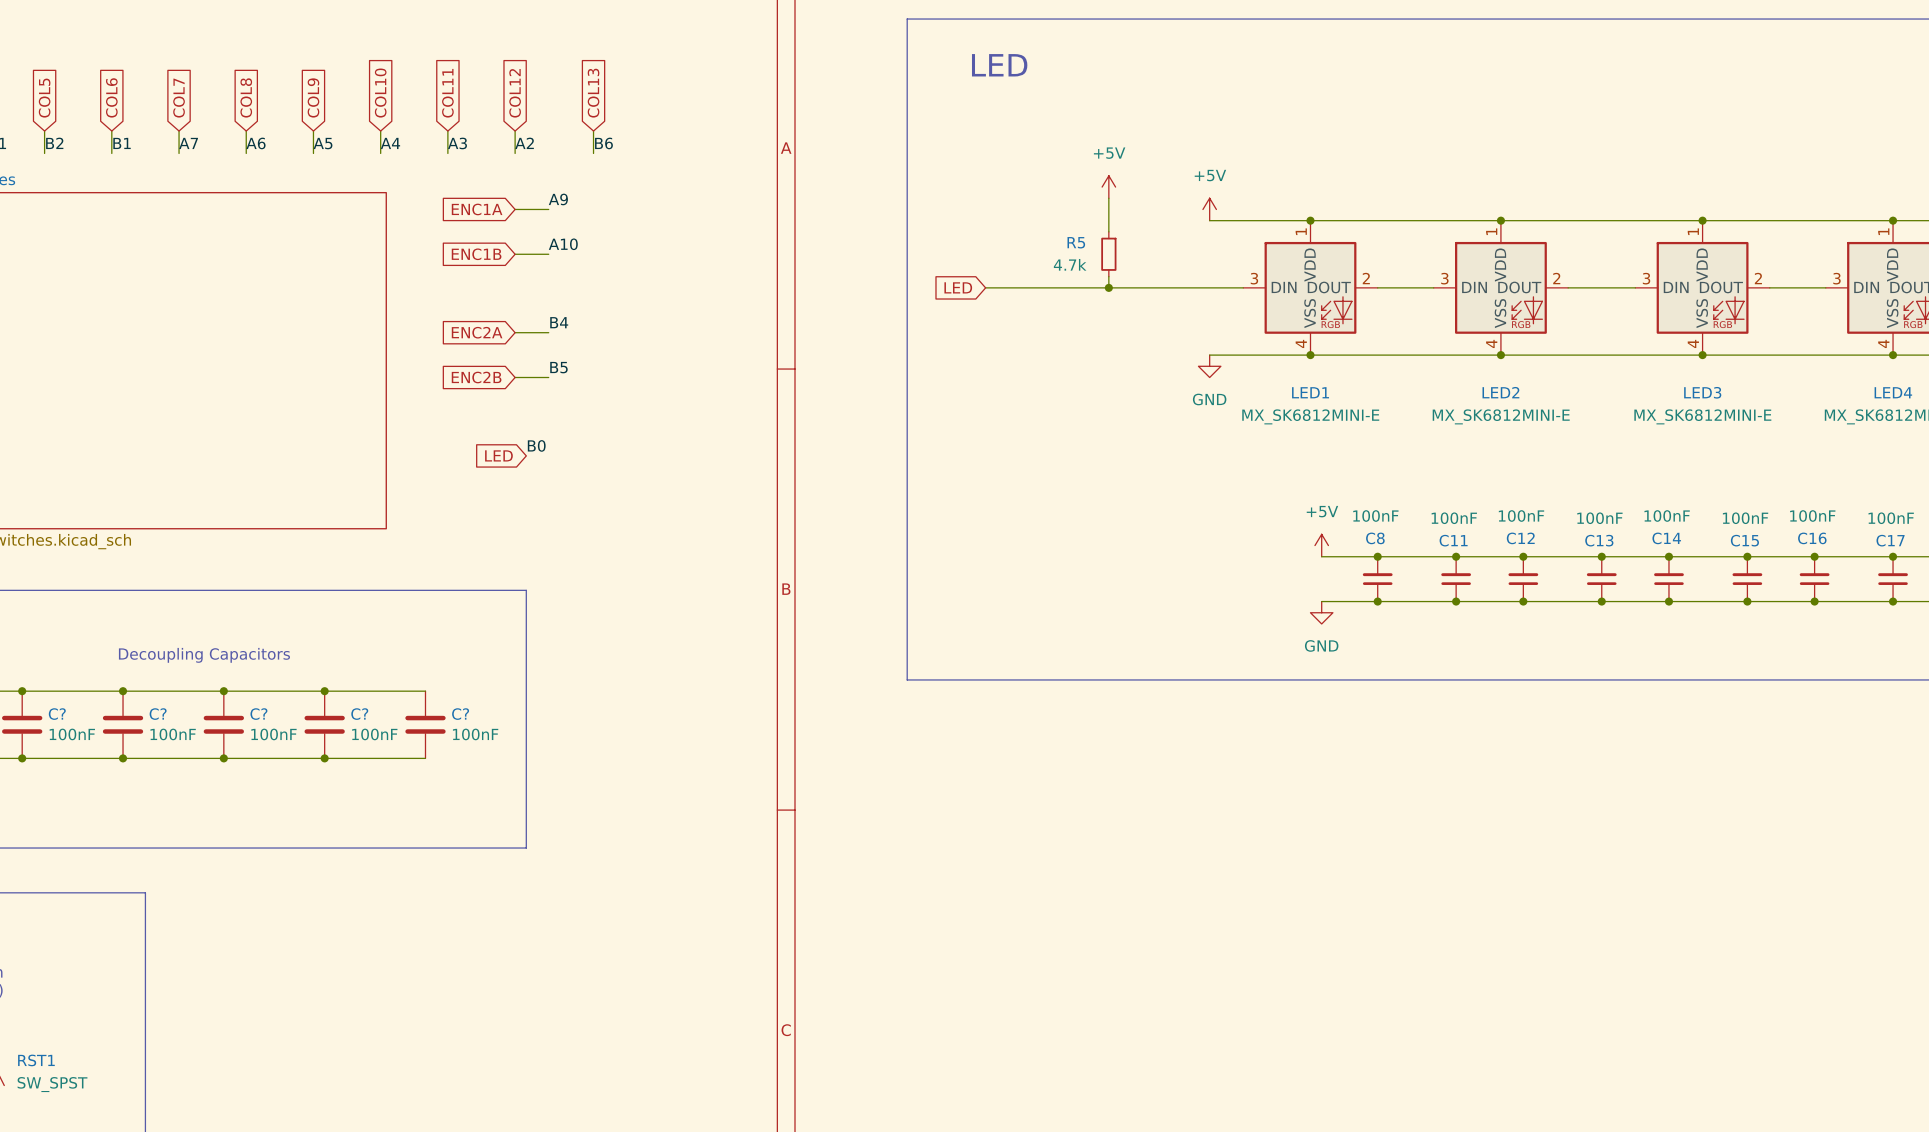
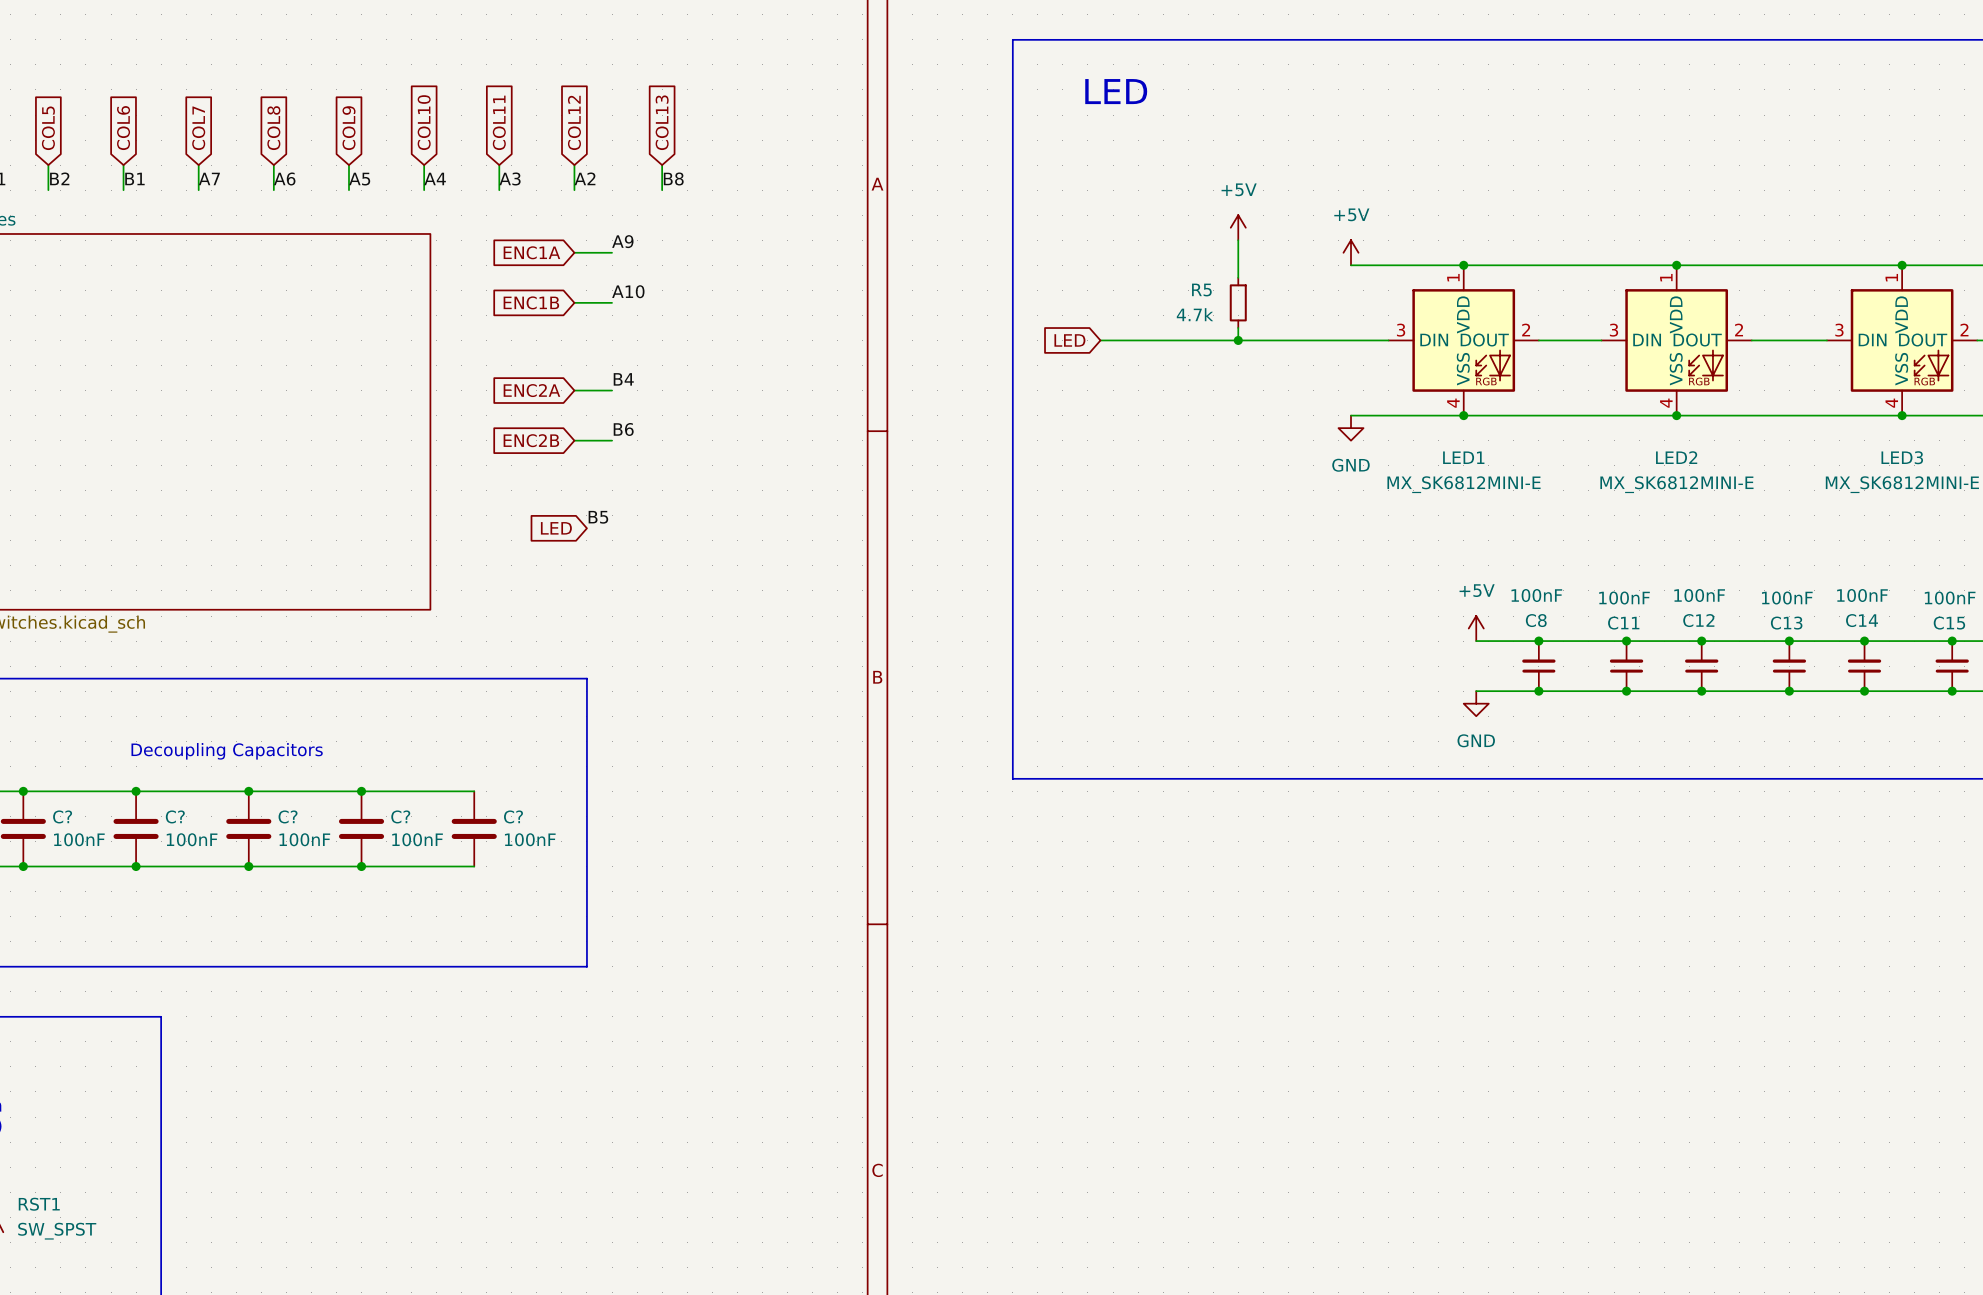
label: B6 (603, 143) -> B8 (673, 178)
label: B5 (558, 367) -> B6 (623, 429)
label: B0 (536, 445) -> B5 (598, 517)

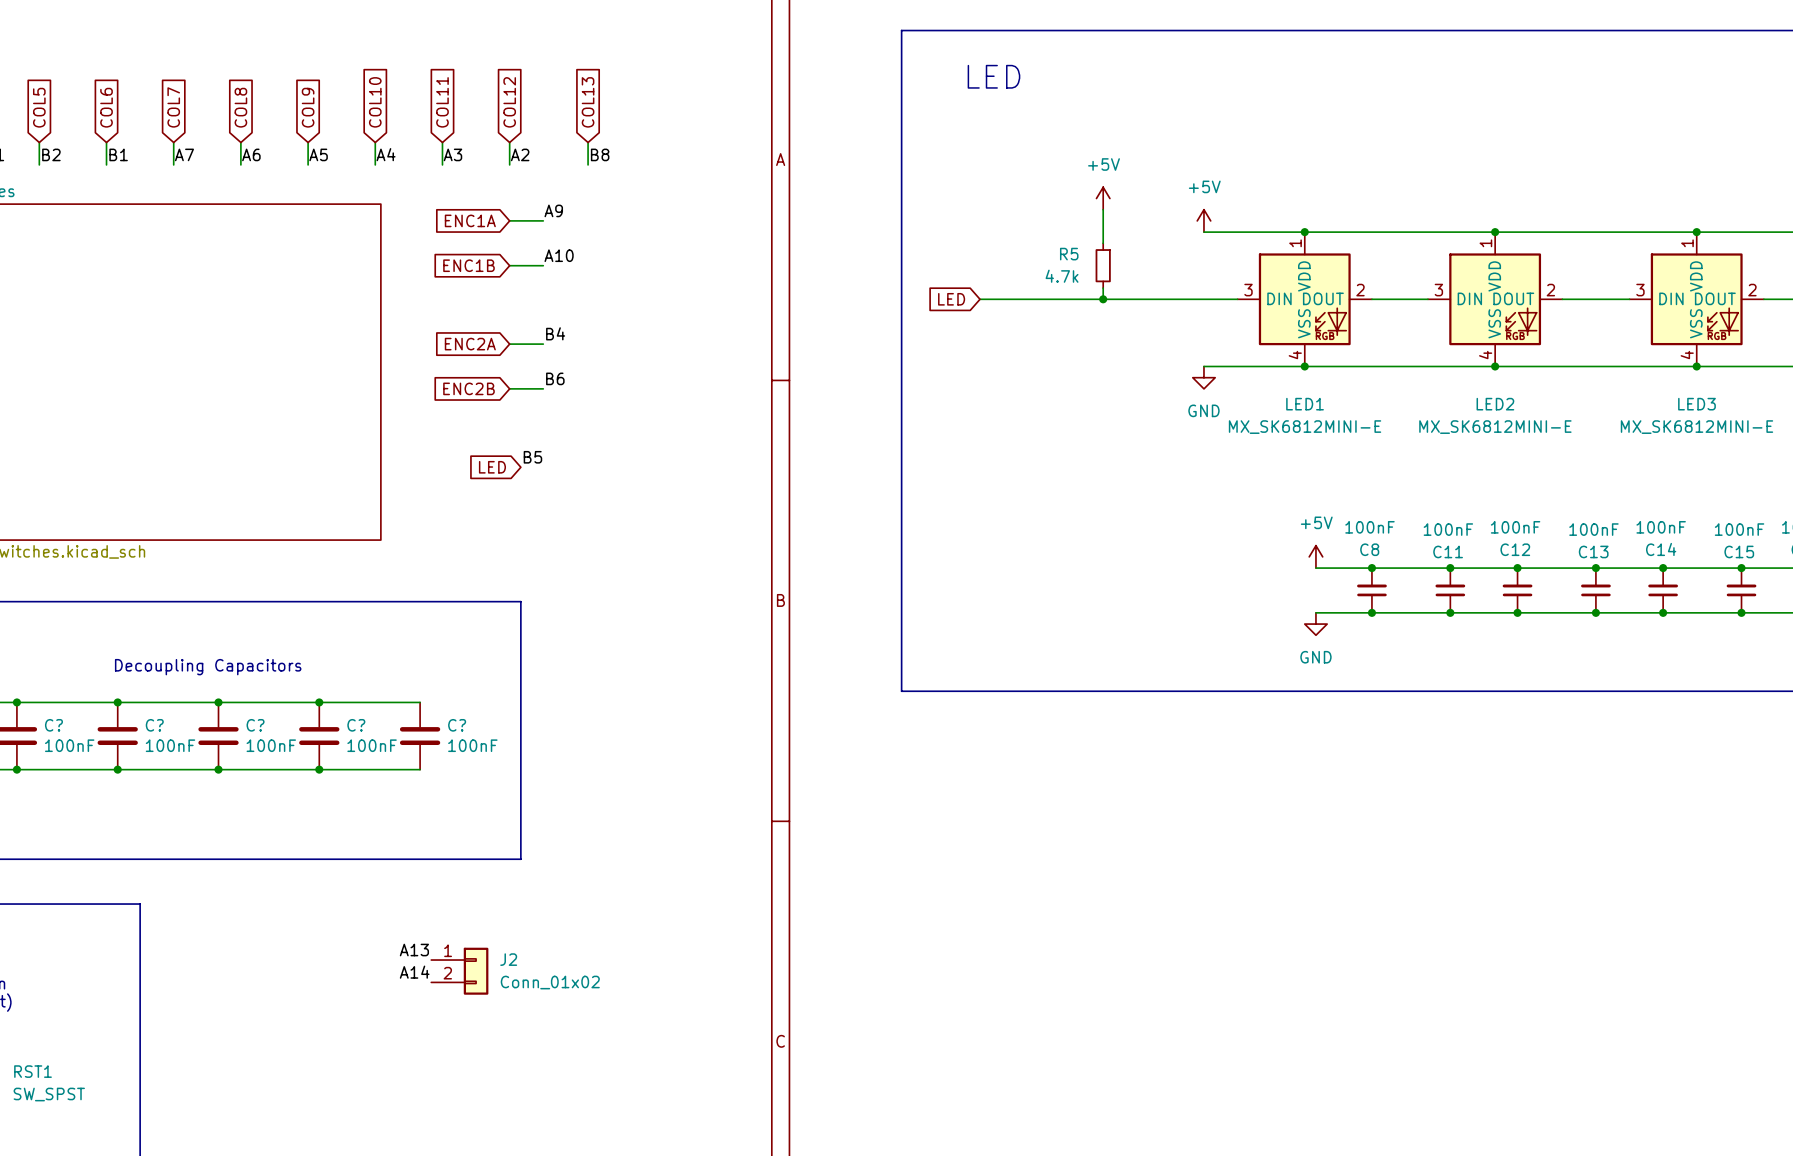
label: none -> A13 (414, 950)
J2: none -> Conn_01x02 (459, 971)
label: none -> A14 (414, 972)

